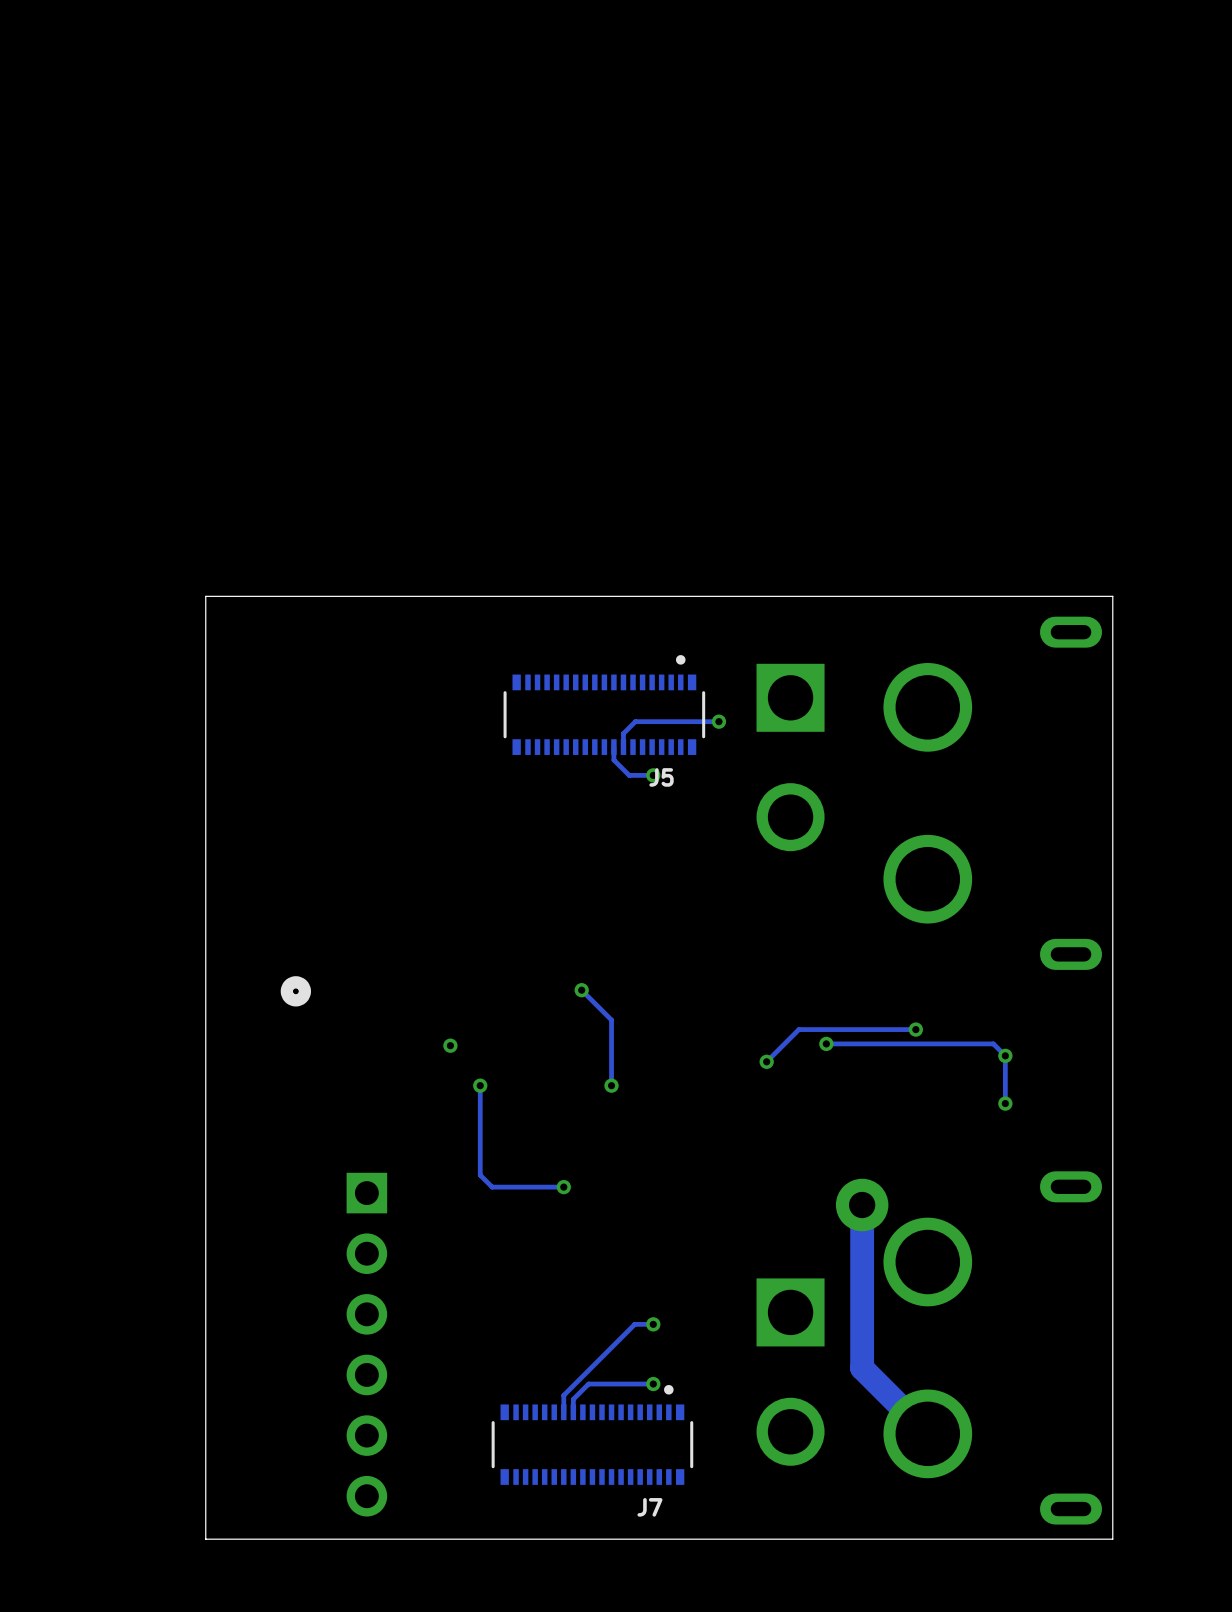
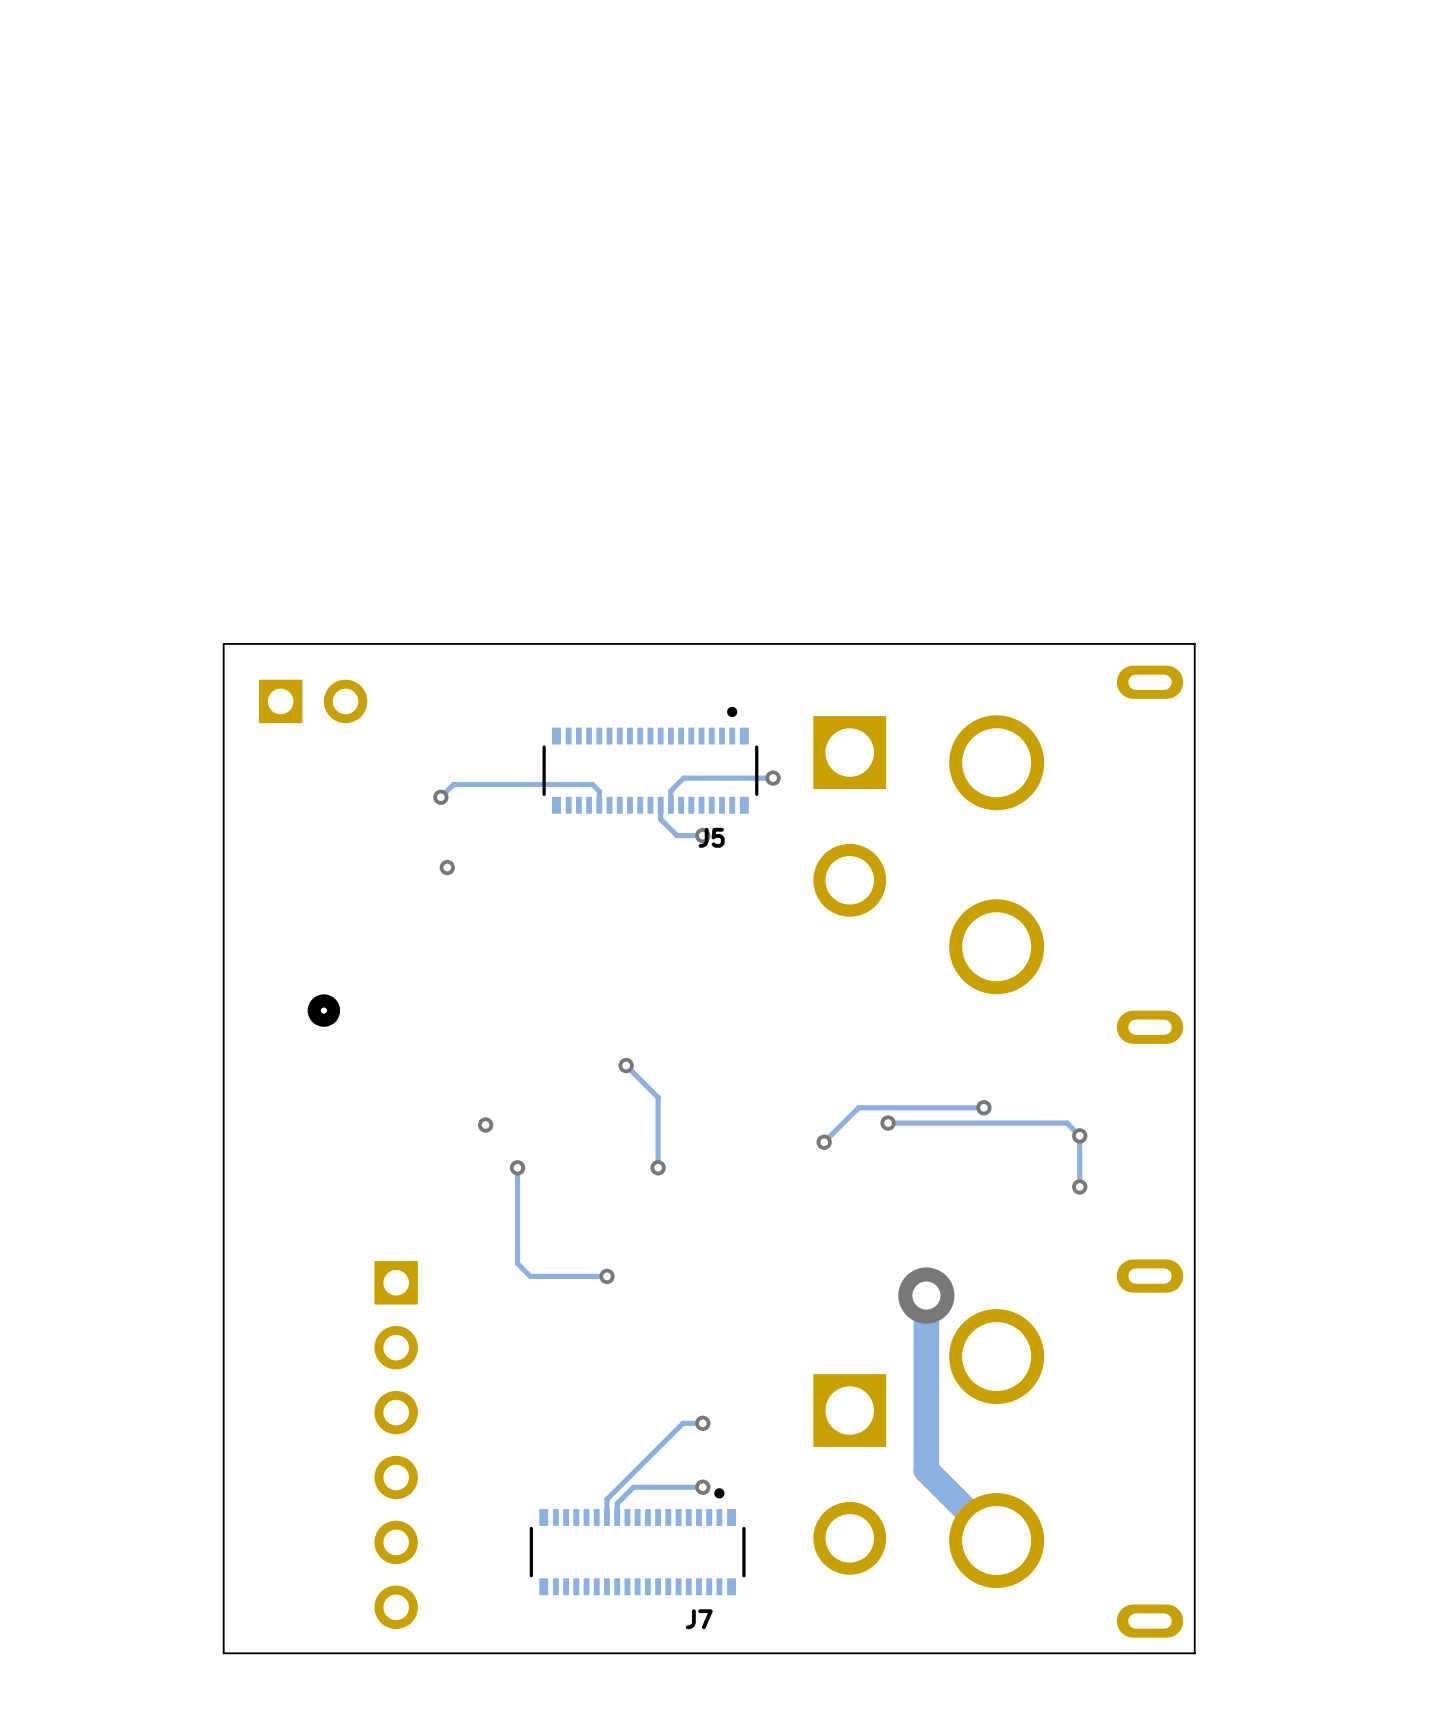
part: none -> (313, 701)
track: none -> (440, 797) (453, 784) (592, 784) (599, 791) (599, 805)
via: none -> (440, 797)
via: none -> (447, 867)
part position: (295, 991) -> (323, 1010)

